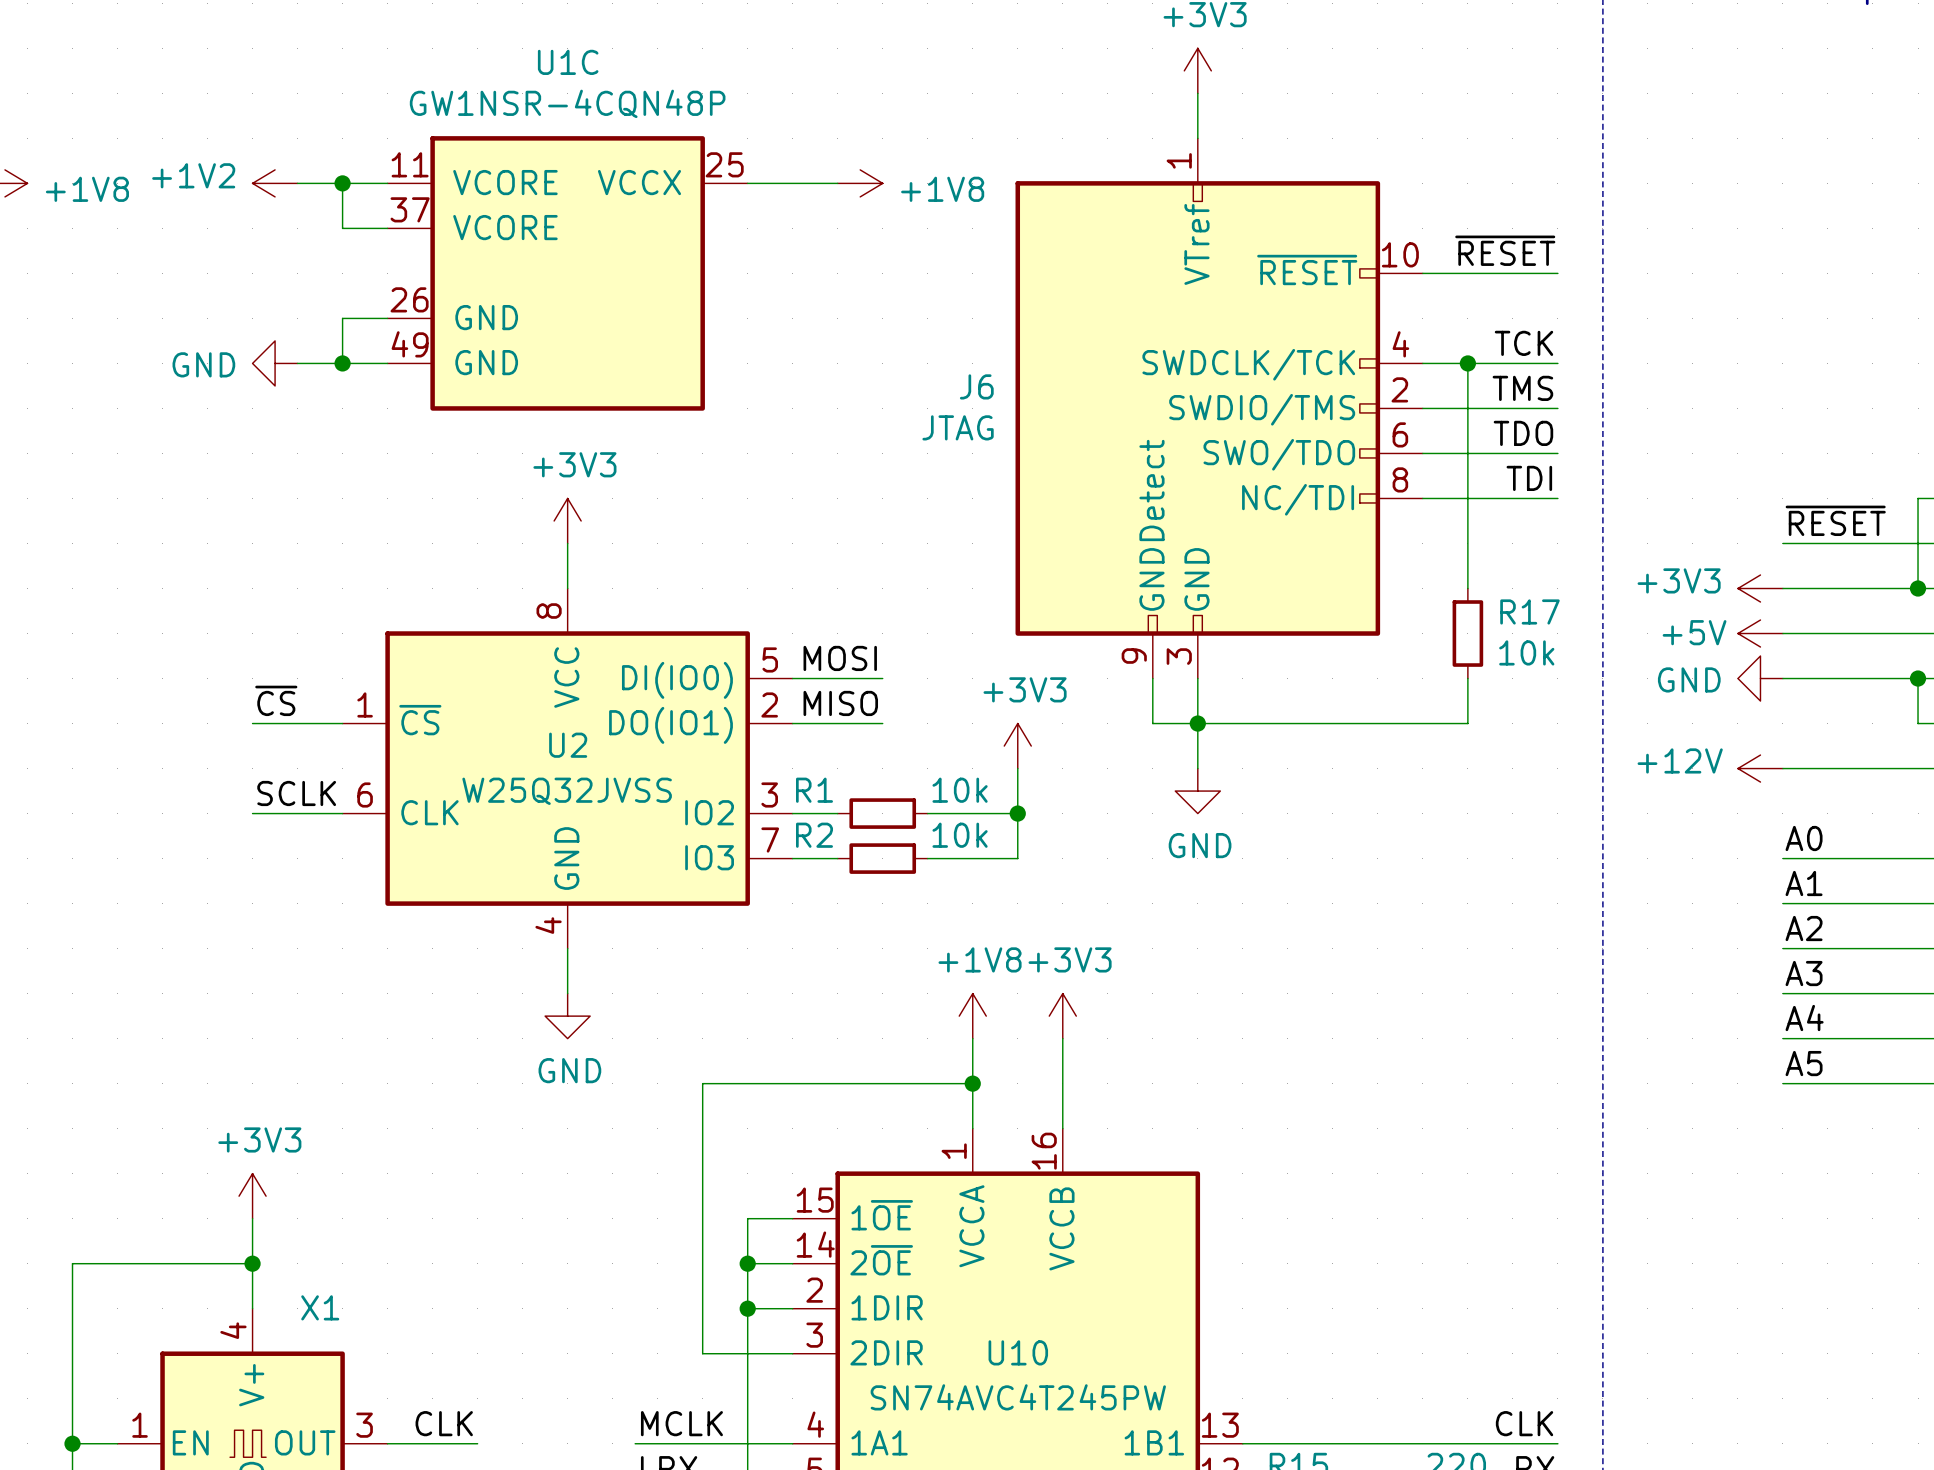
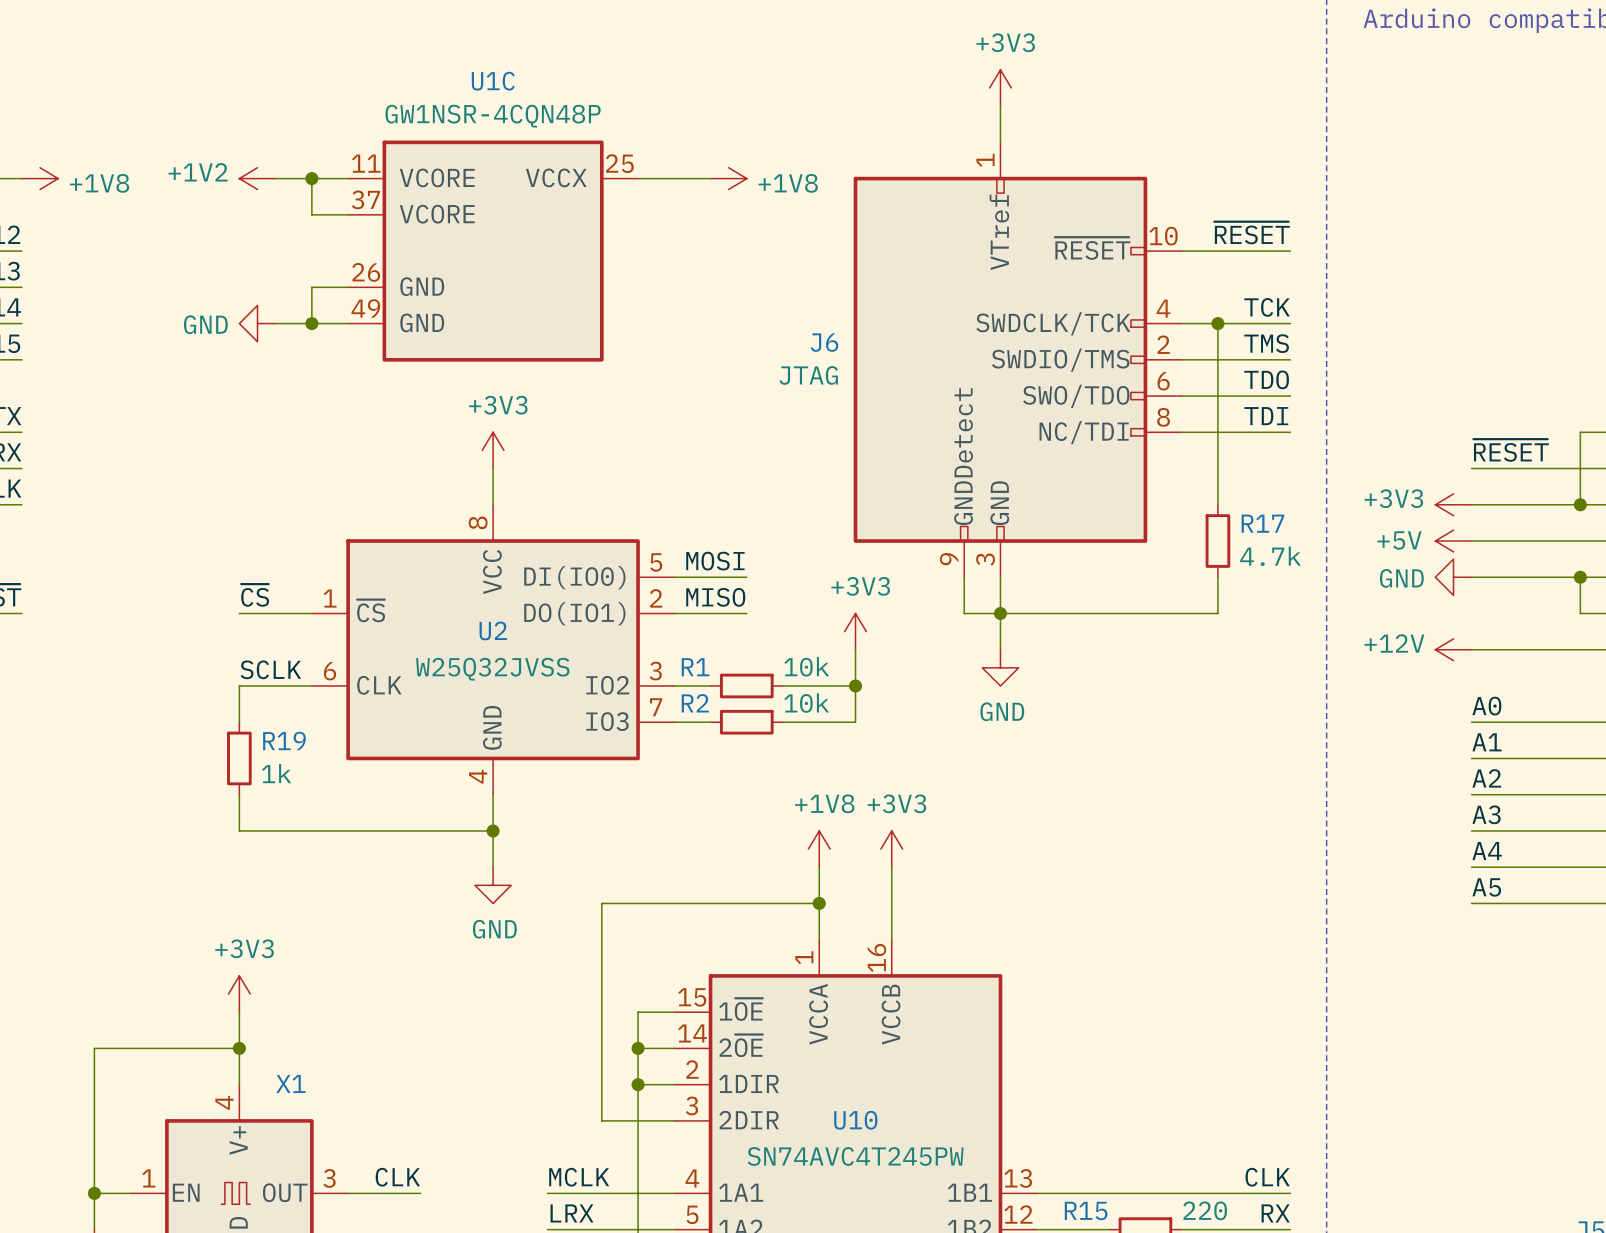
R17 value: 10k (1526, 652) -> 4.7k (1270, 556)
wire: none -> (239, 686) (239, 722)
R19: none -> 1k (239, 758)
wire: none -> (239, 794) (239, 830) (493, 830) (493, 867)
junction: none -> (493, 830)
power symbol position: GND (567, 1016) -> GND (493, 885)

